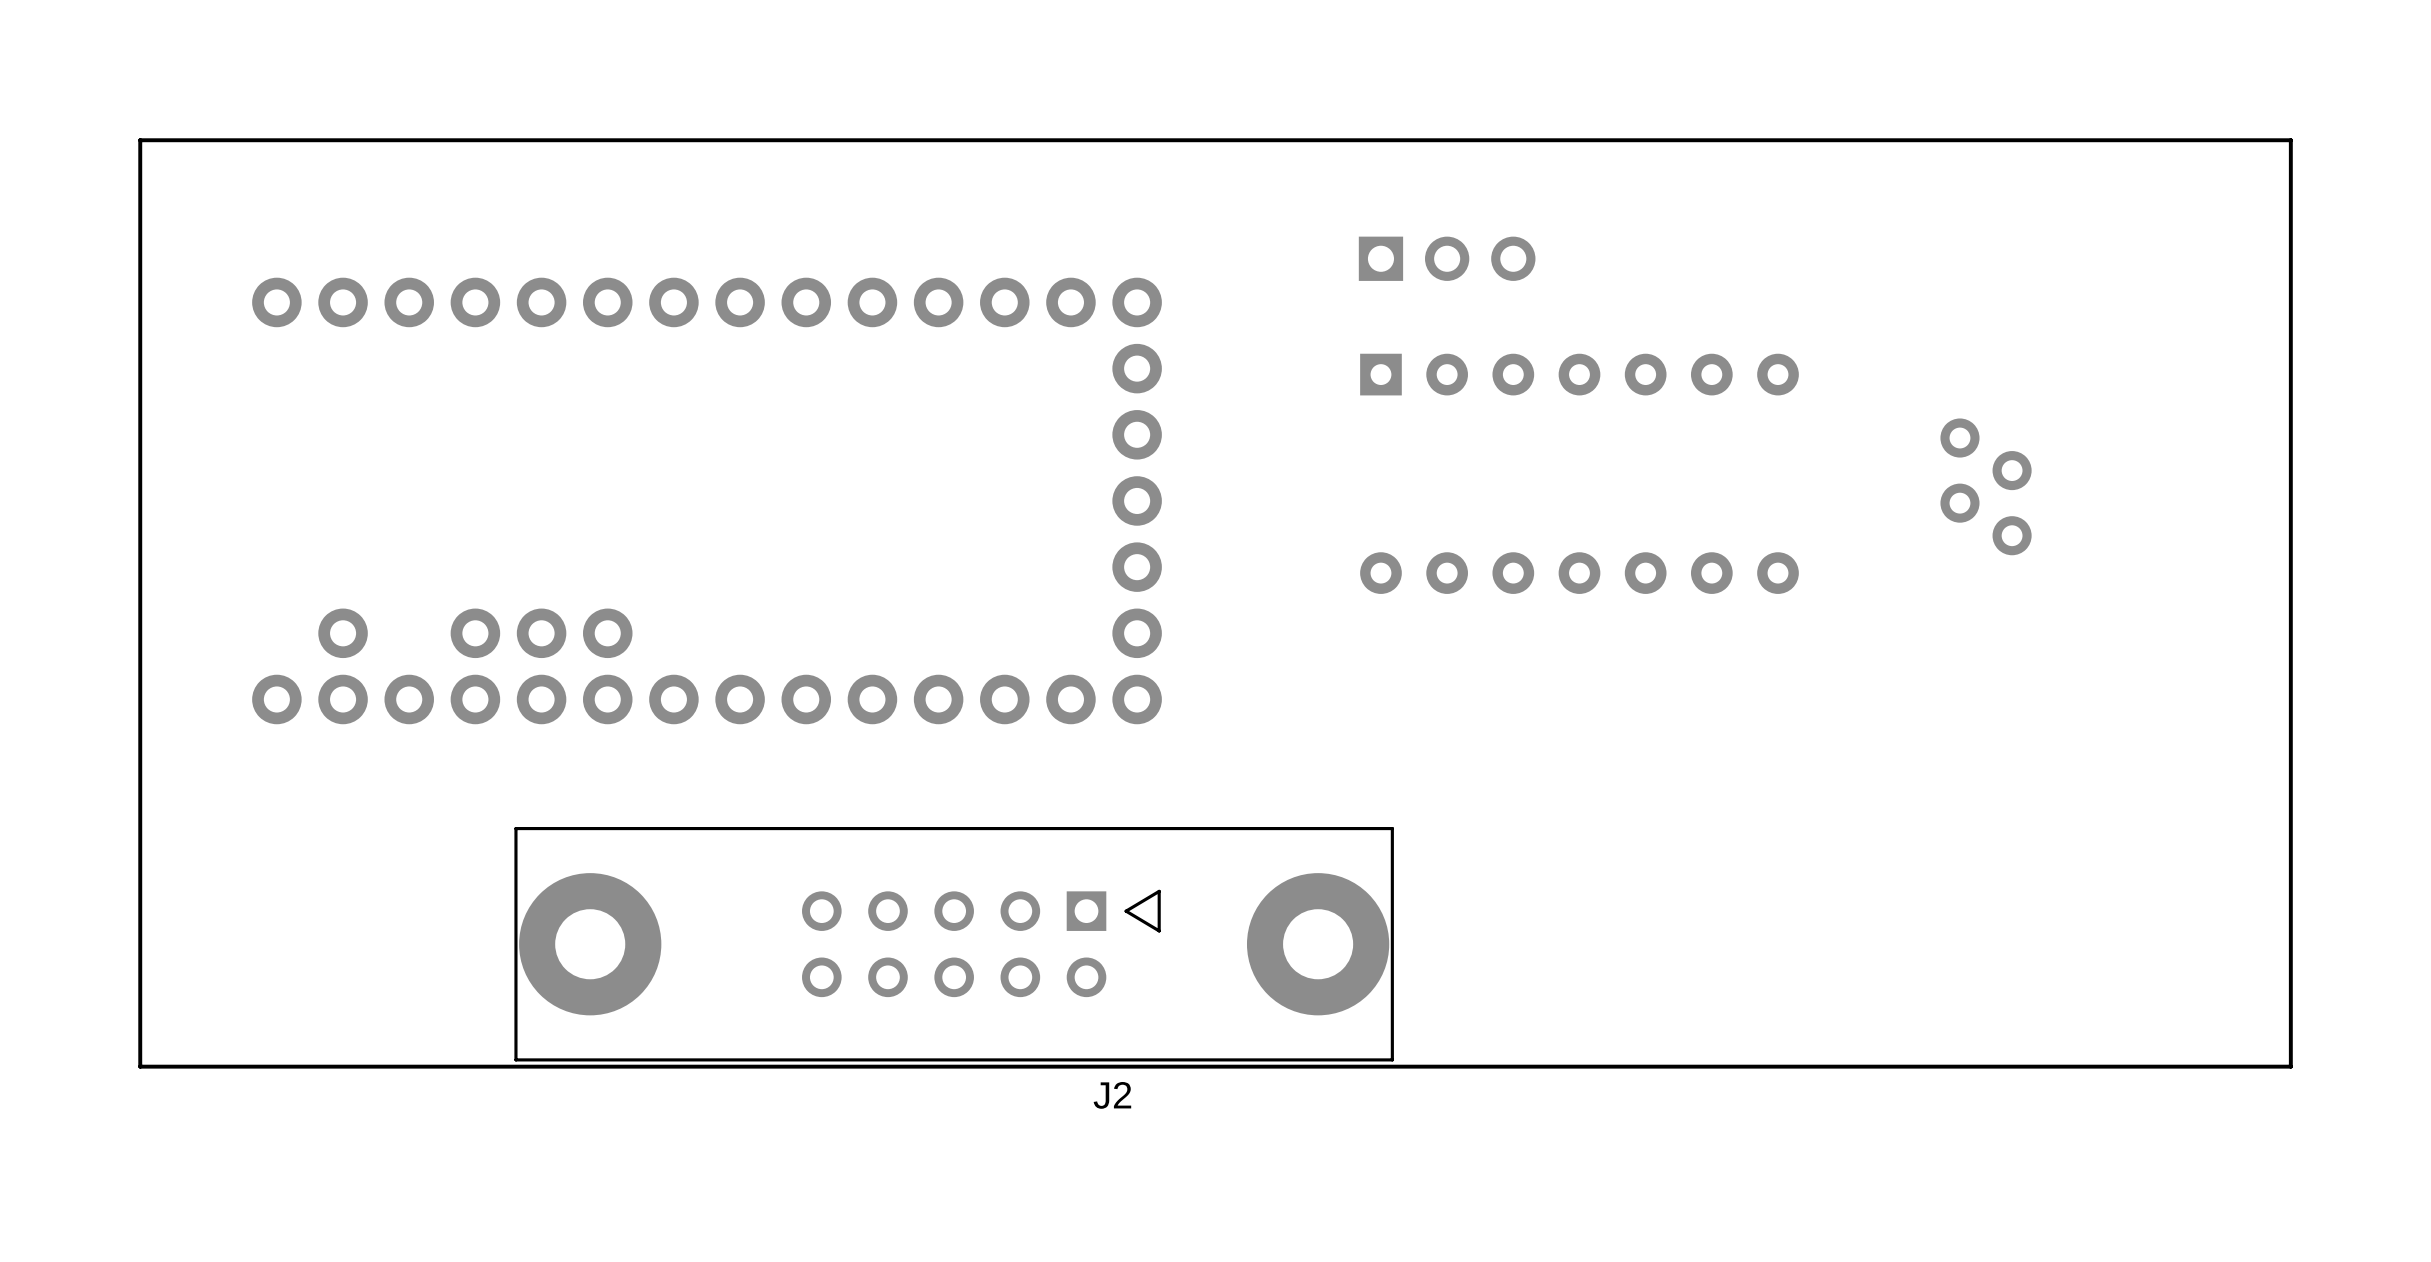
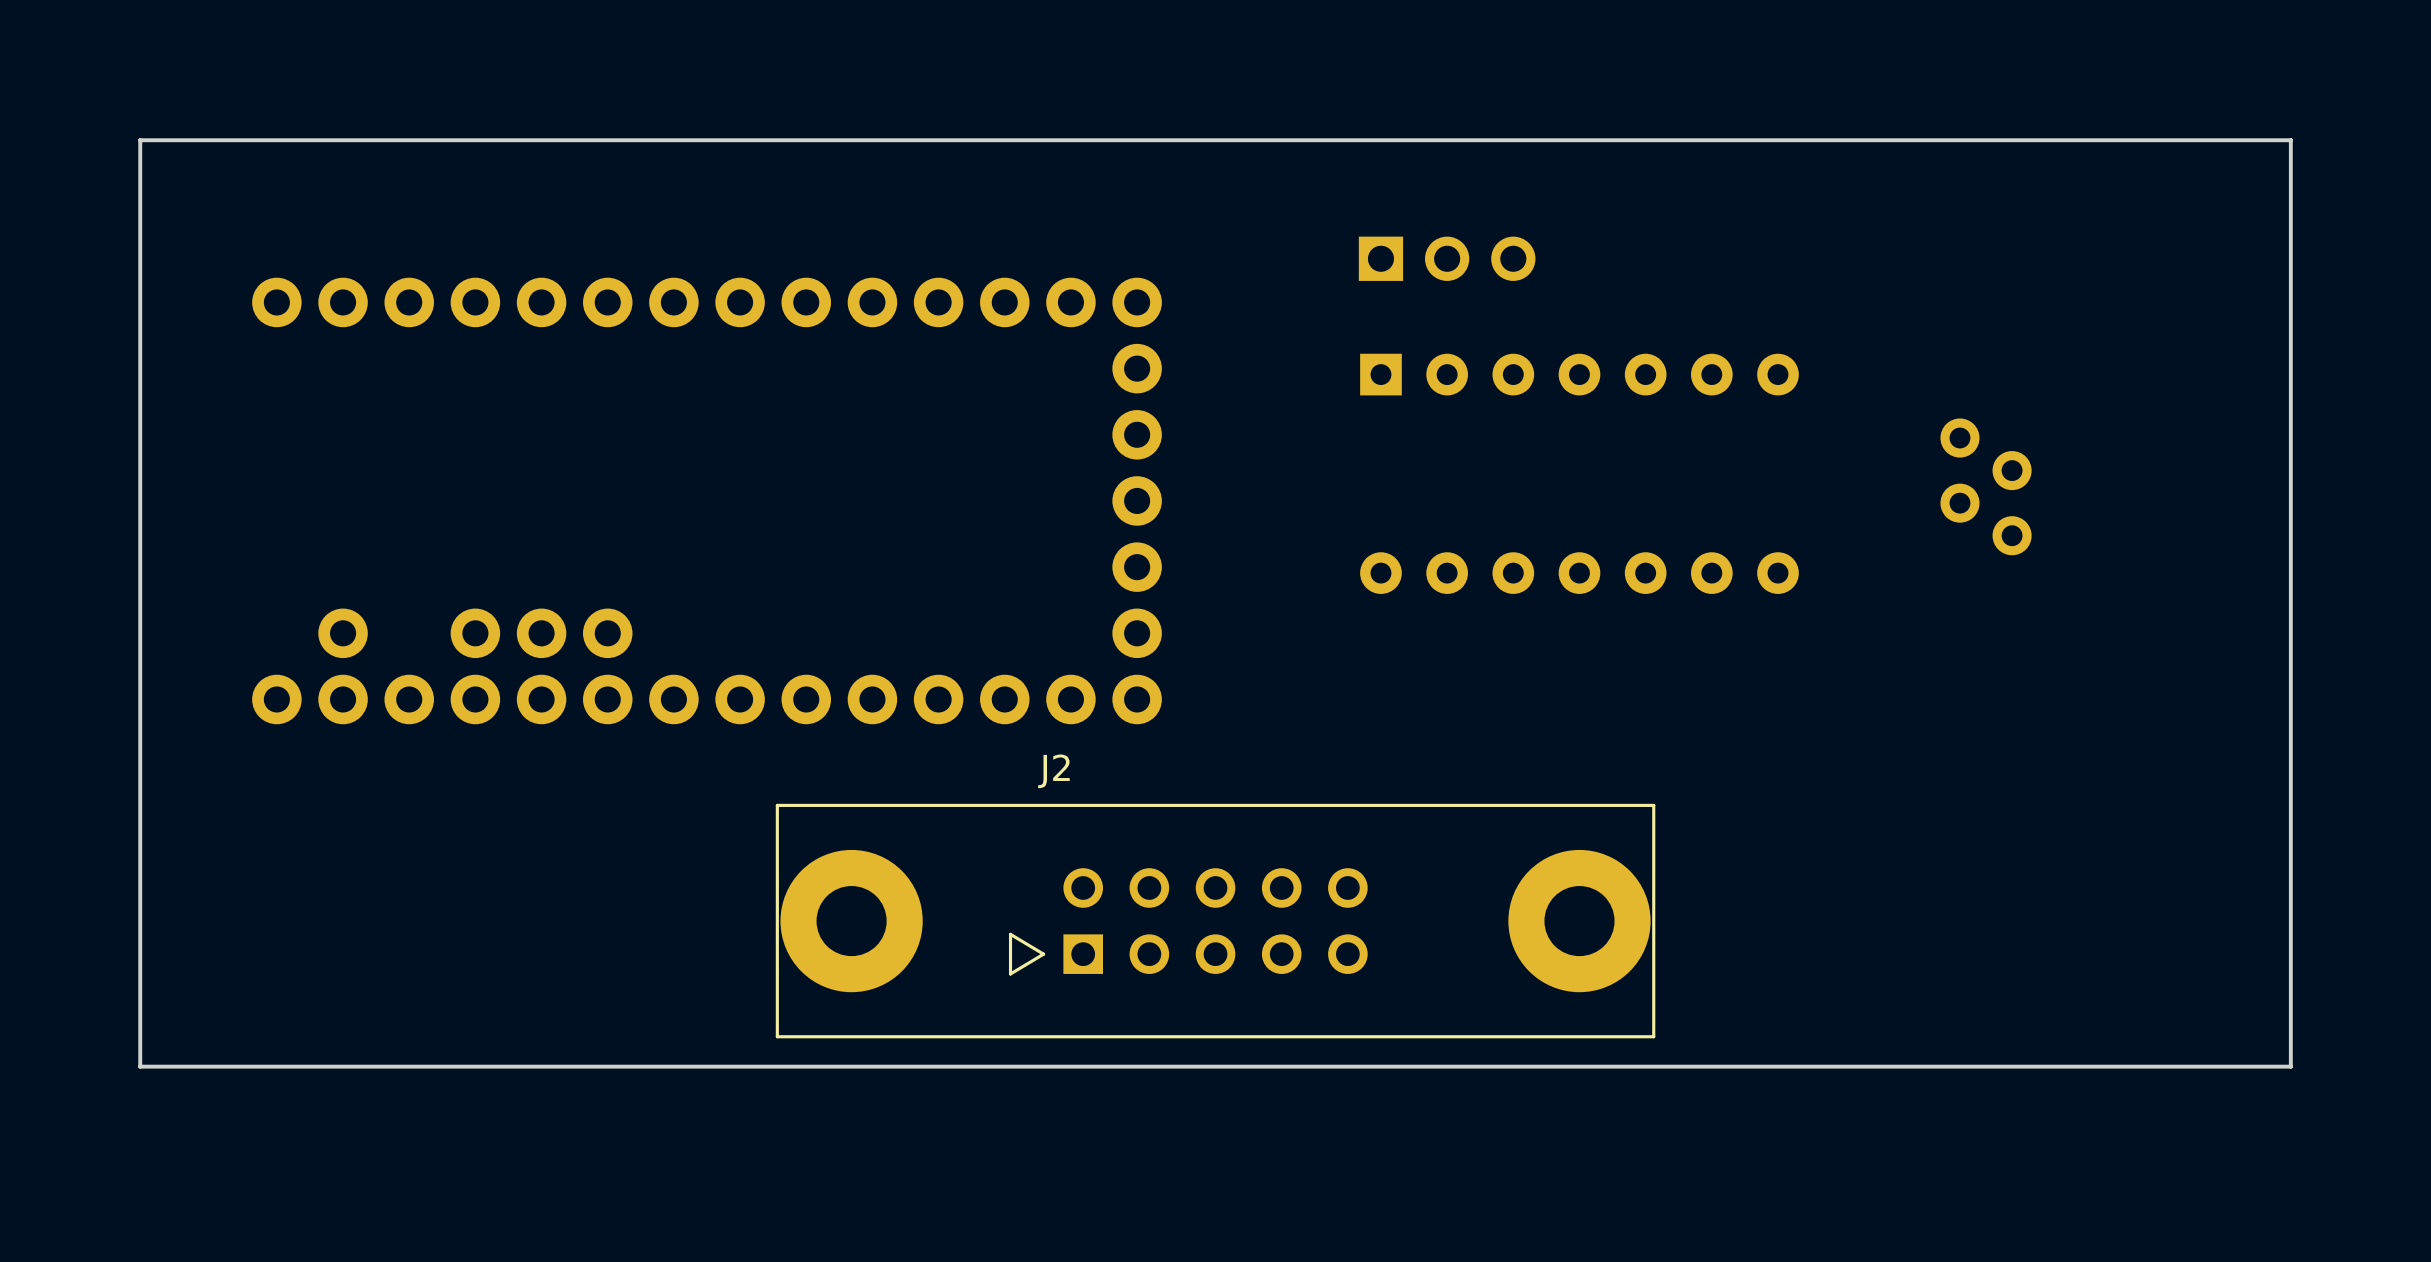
J2 rotation: 0° (954, 944) -> 180° (1215, 921)

